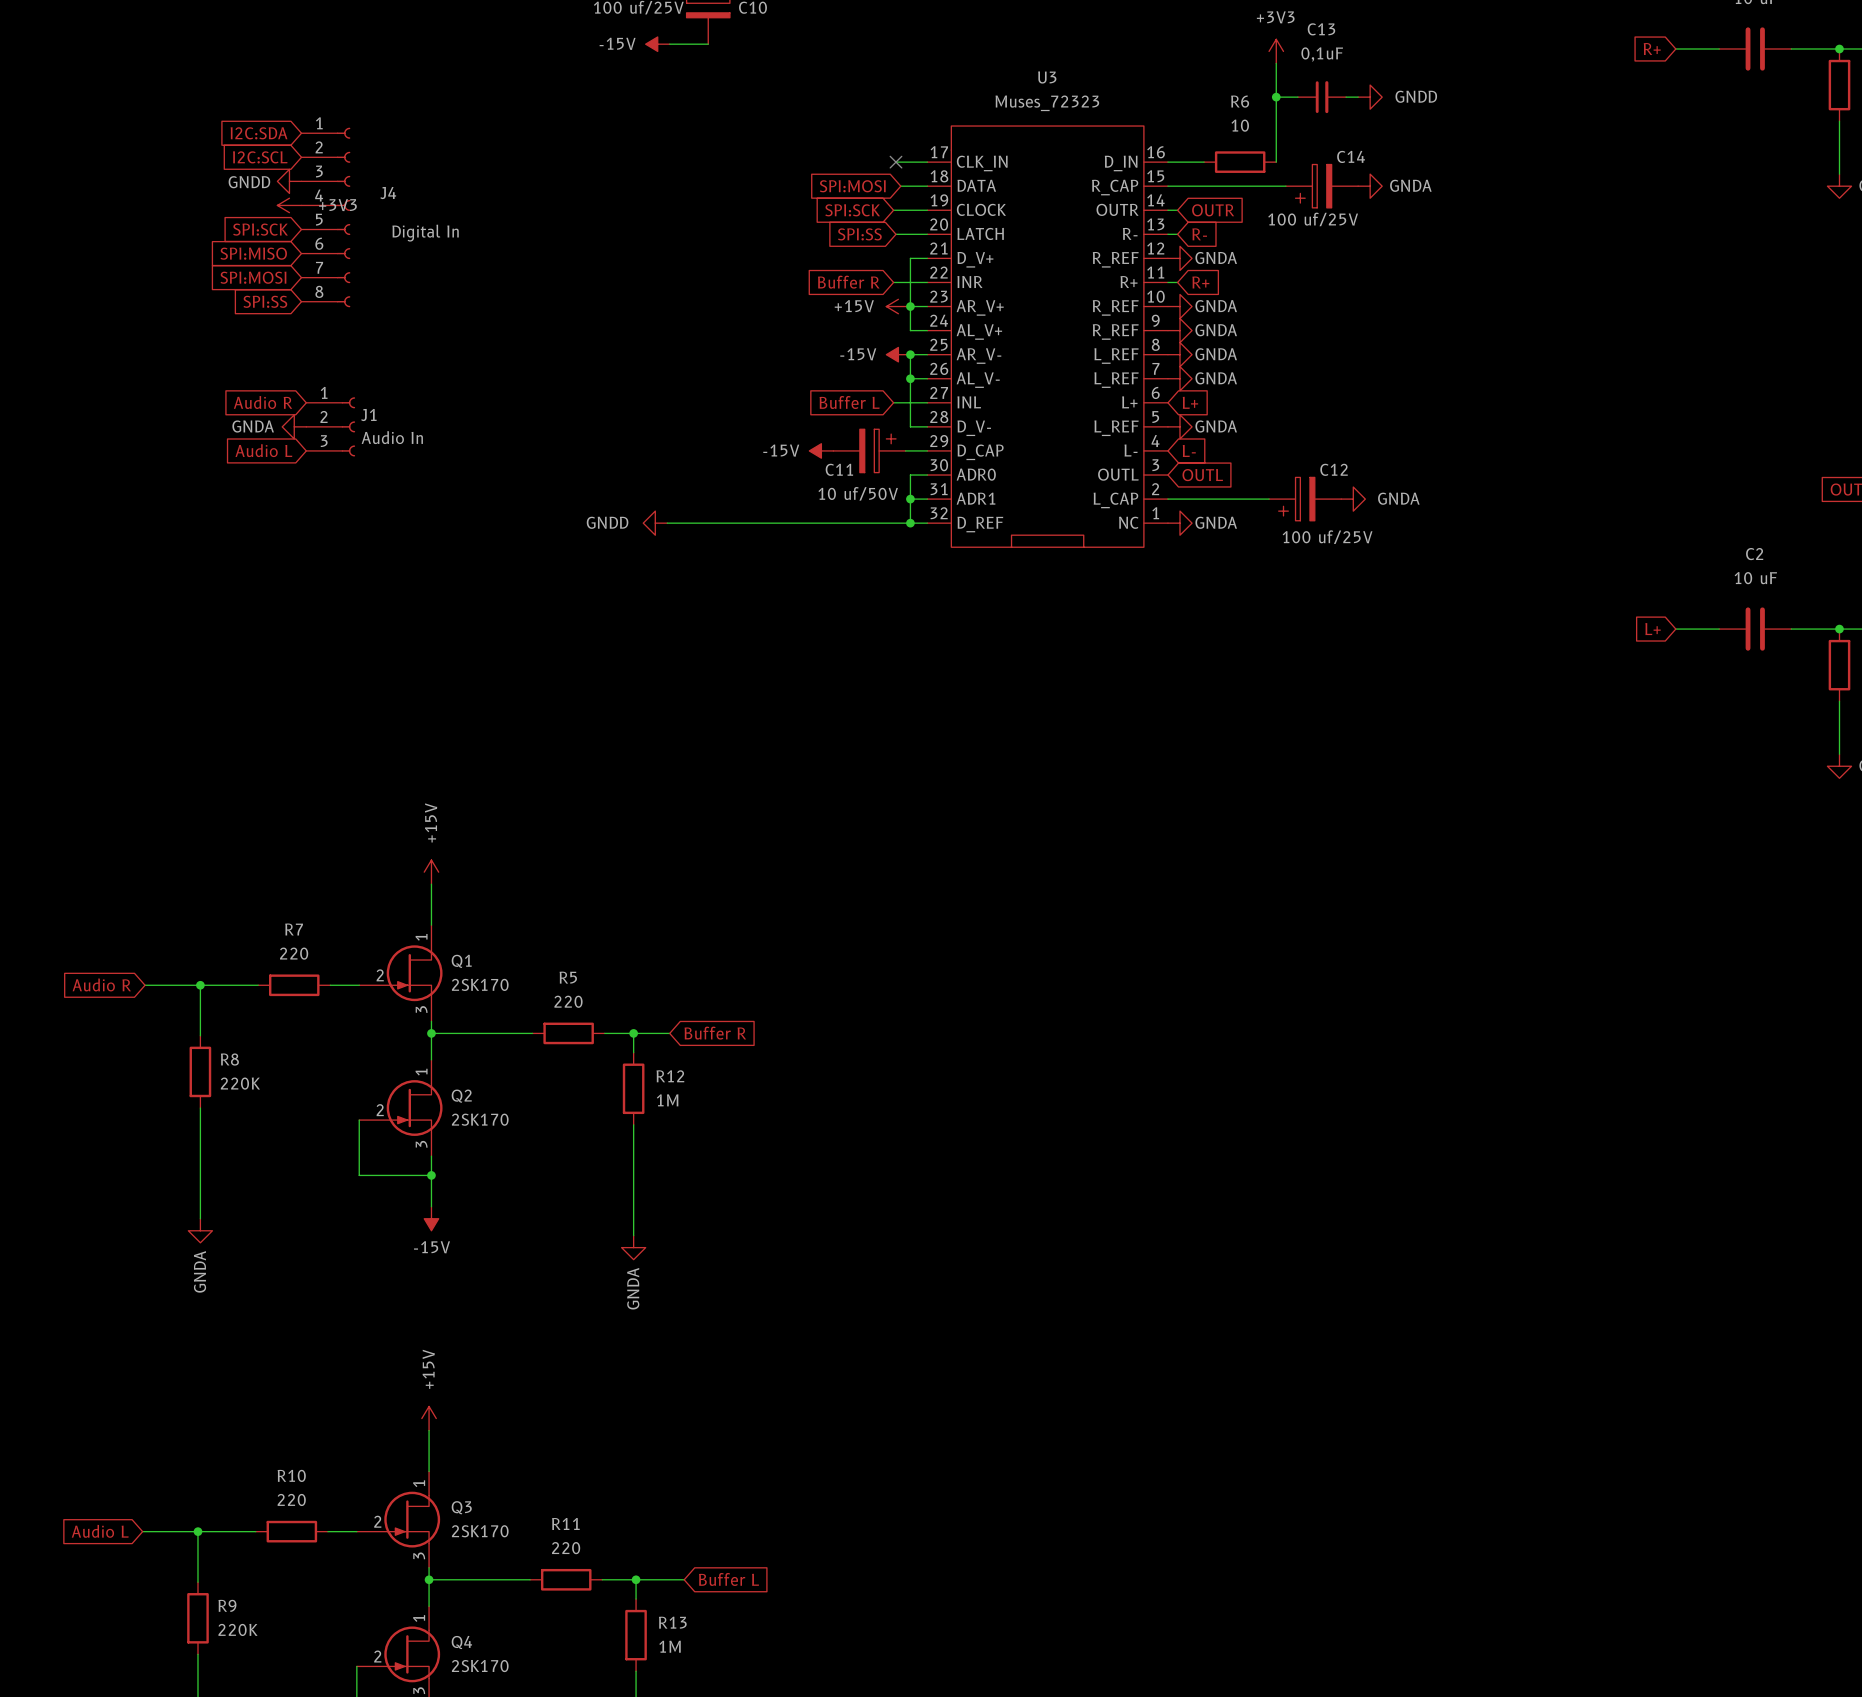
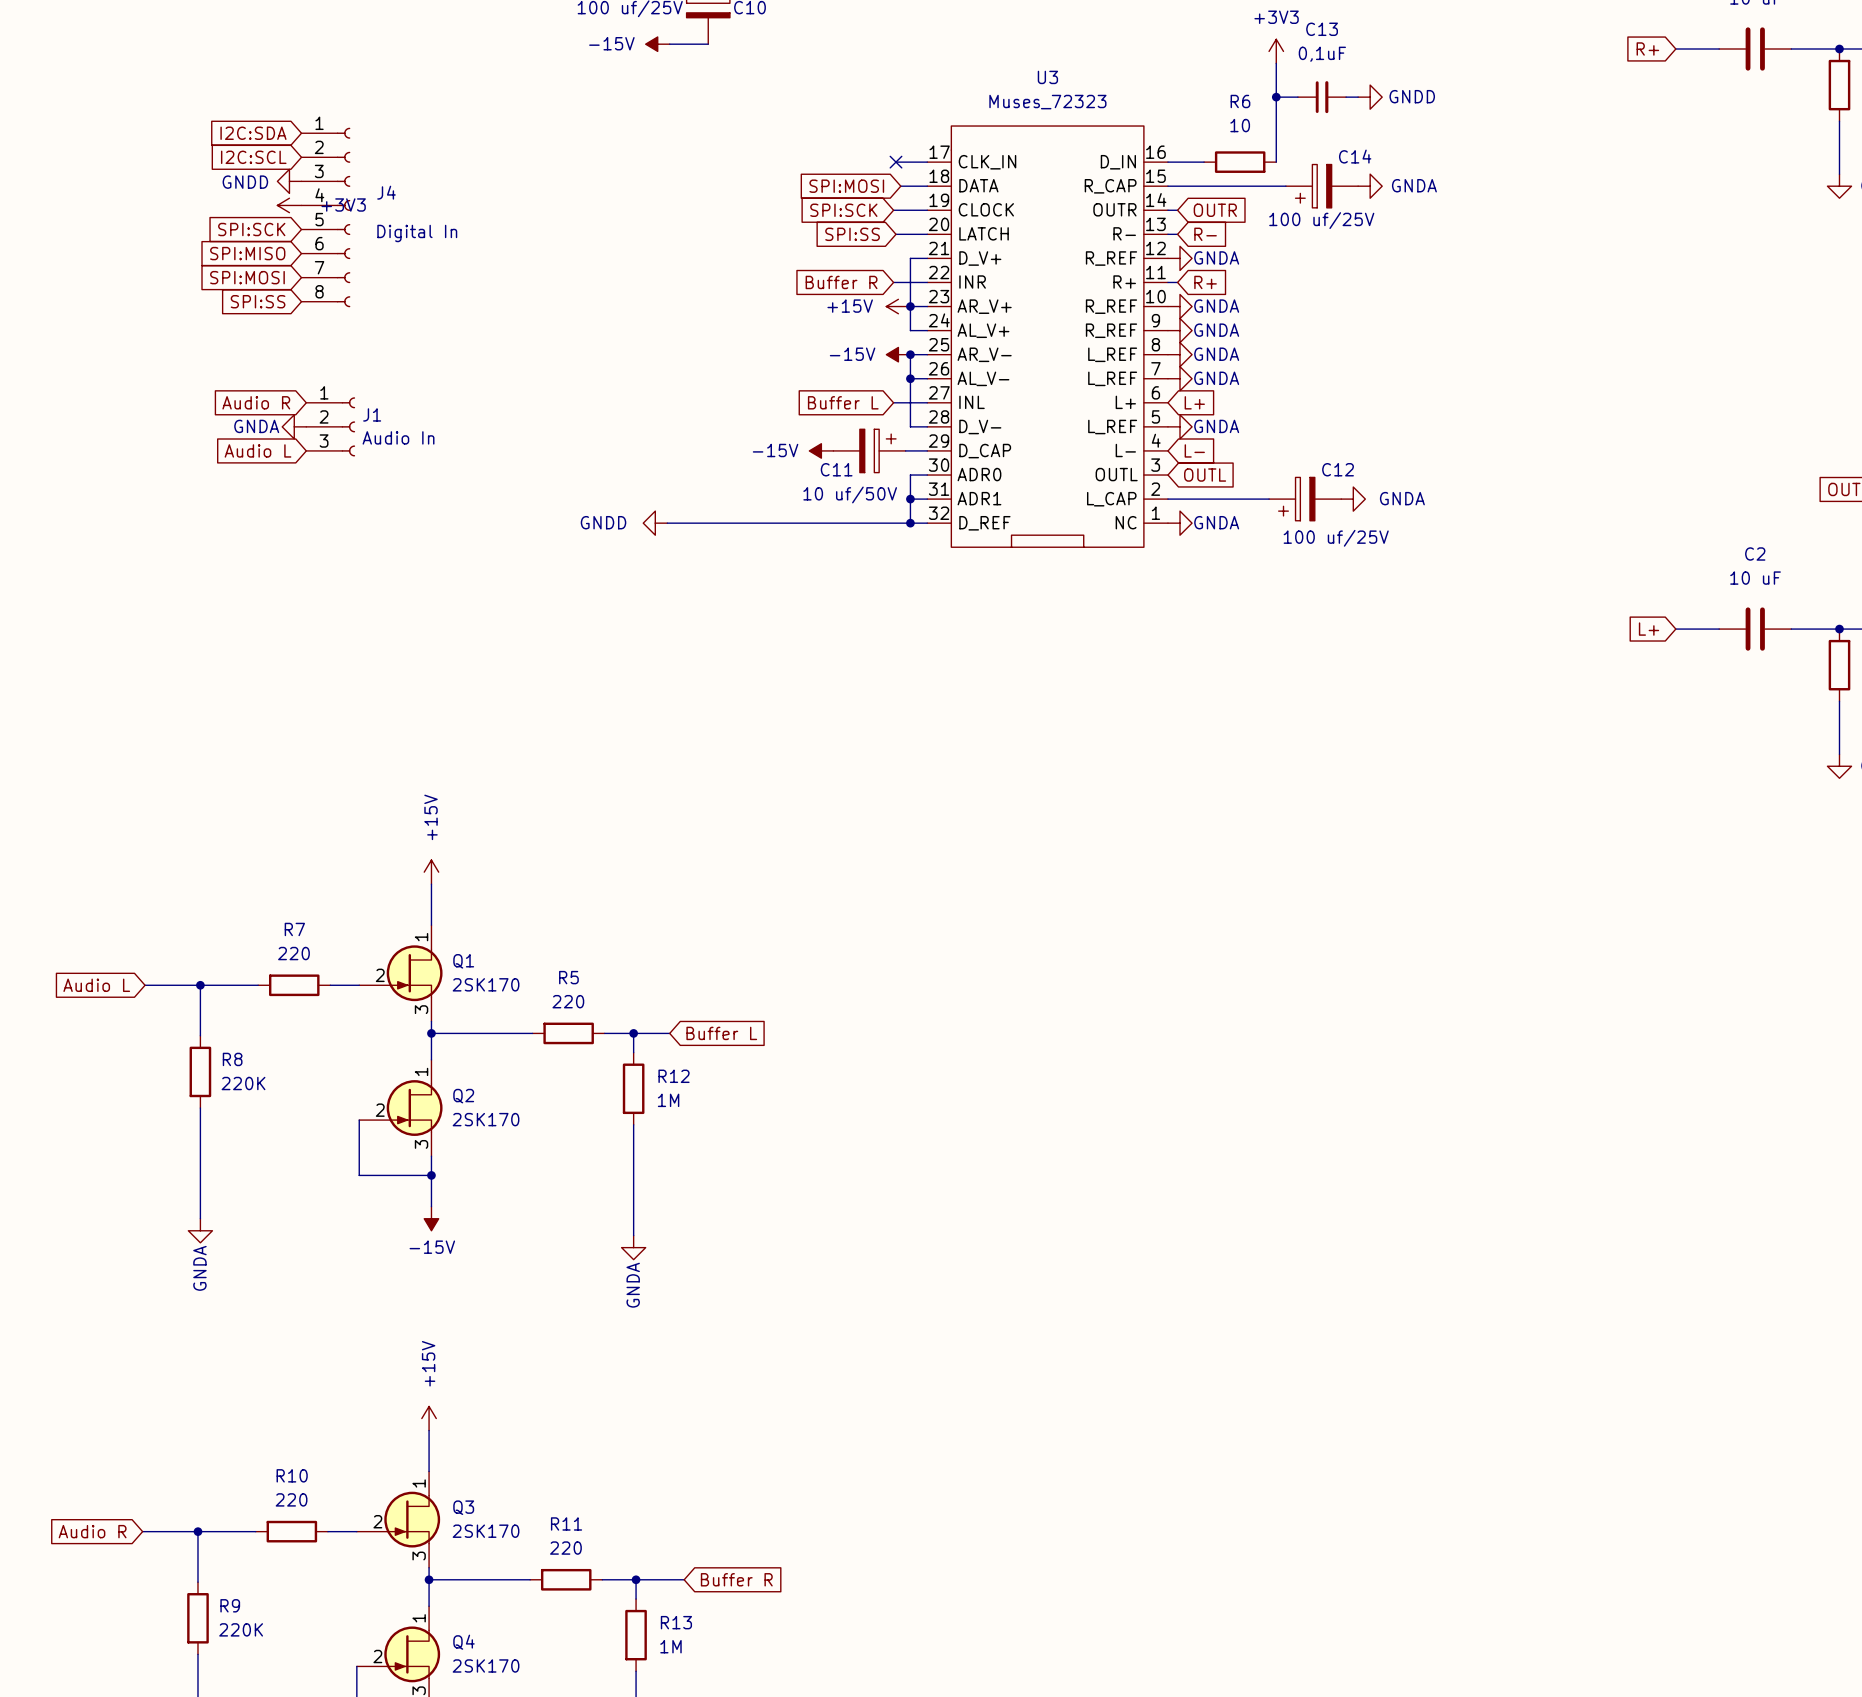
global label: Audio R (101, 984) -> Audio L (96, 985)
global label: Buffer R (715, 1033) -> Buffer L (721, 1033)
global label: Audio L (100, 1531) -> Audio R (92, 1531)
global label: Buffer L (728, 1579) -> Buffer R (736, 1579)

